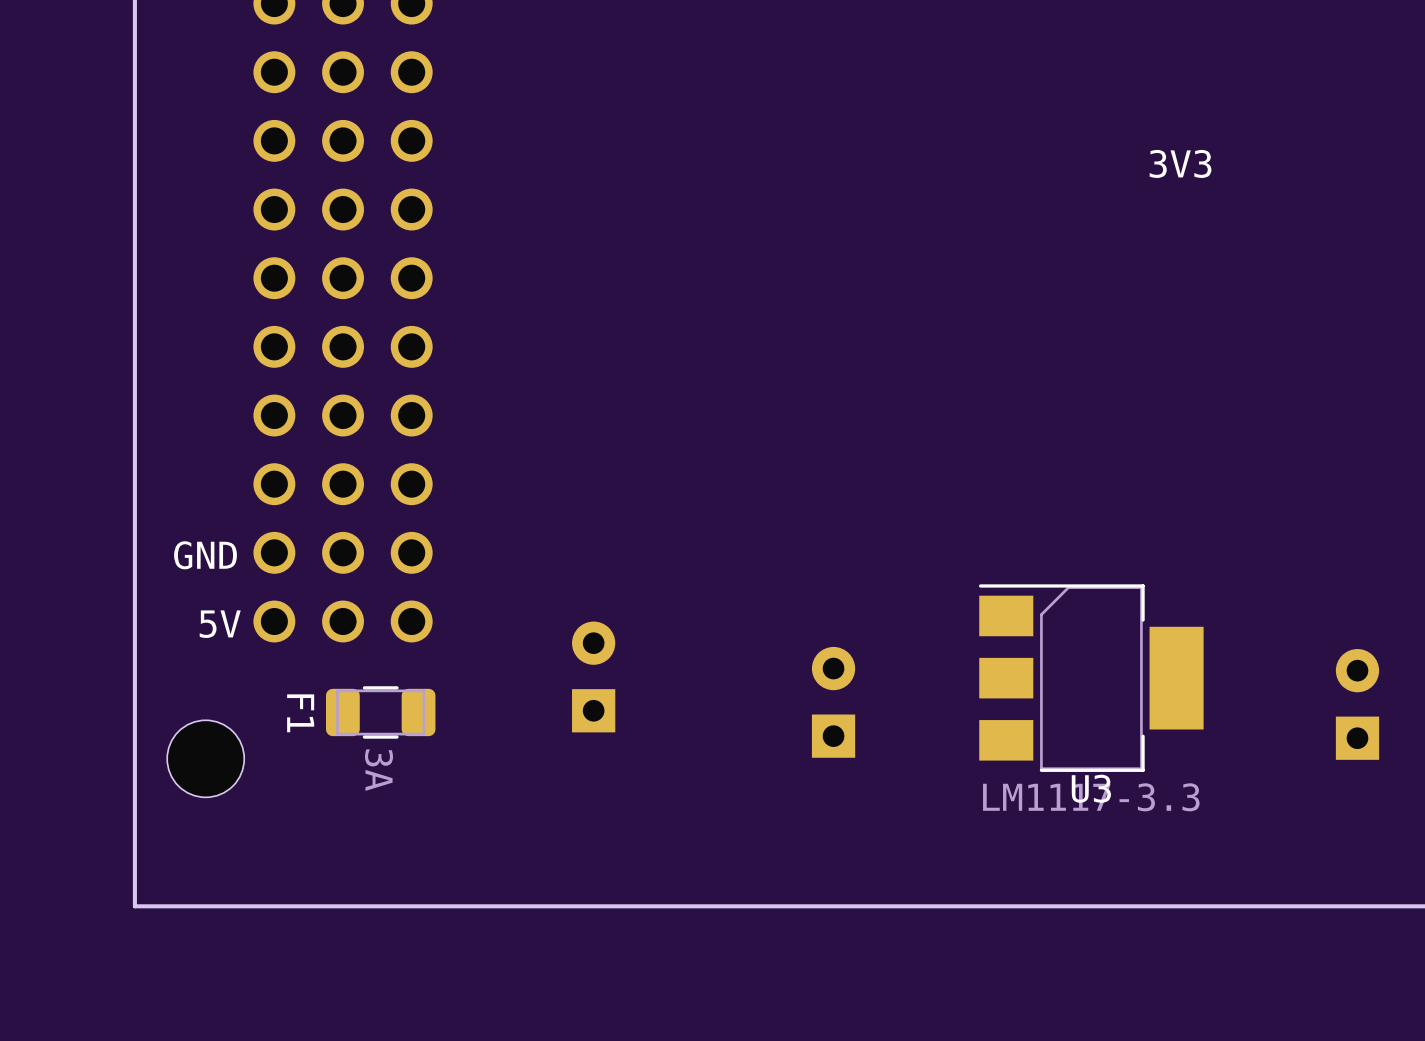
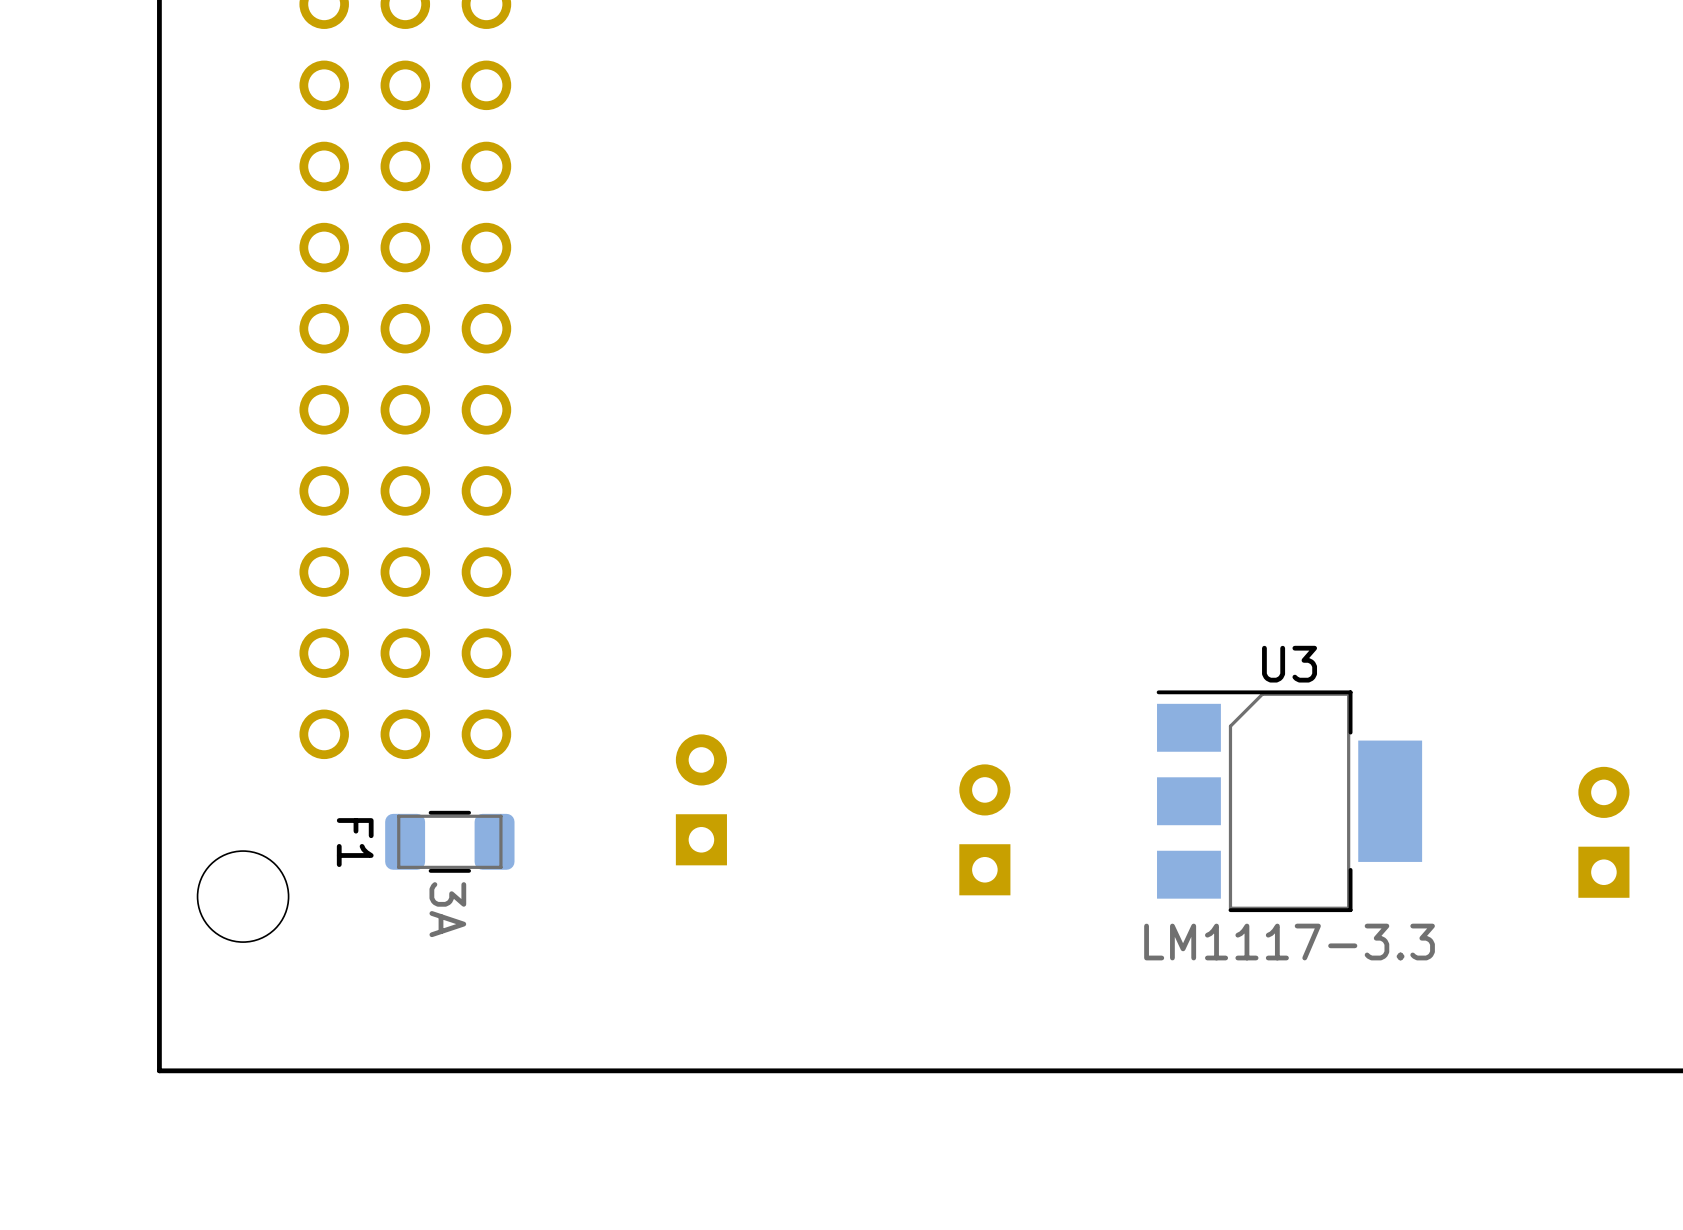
text: 3V3 (1180, 163) -> none
text: GND (205, 555) -> none
text: 5V (220, 624) -> none
U3 name position: U3 (1091, 788) -> U3 (1289, 664)

